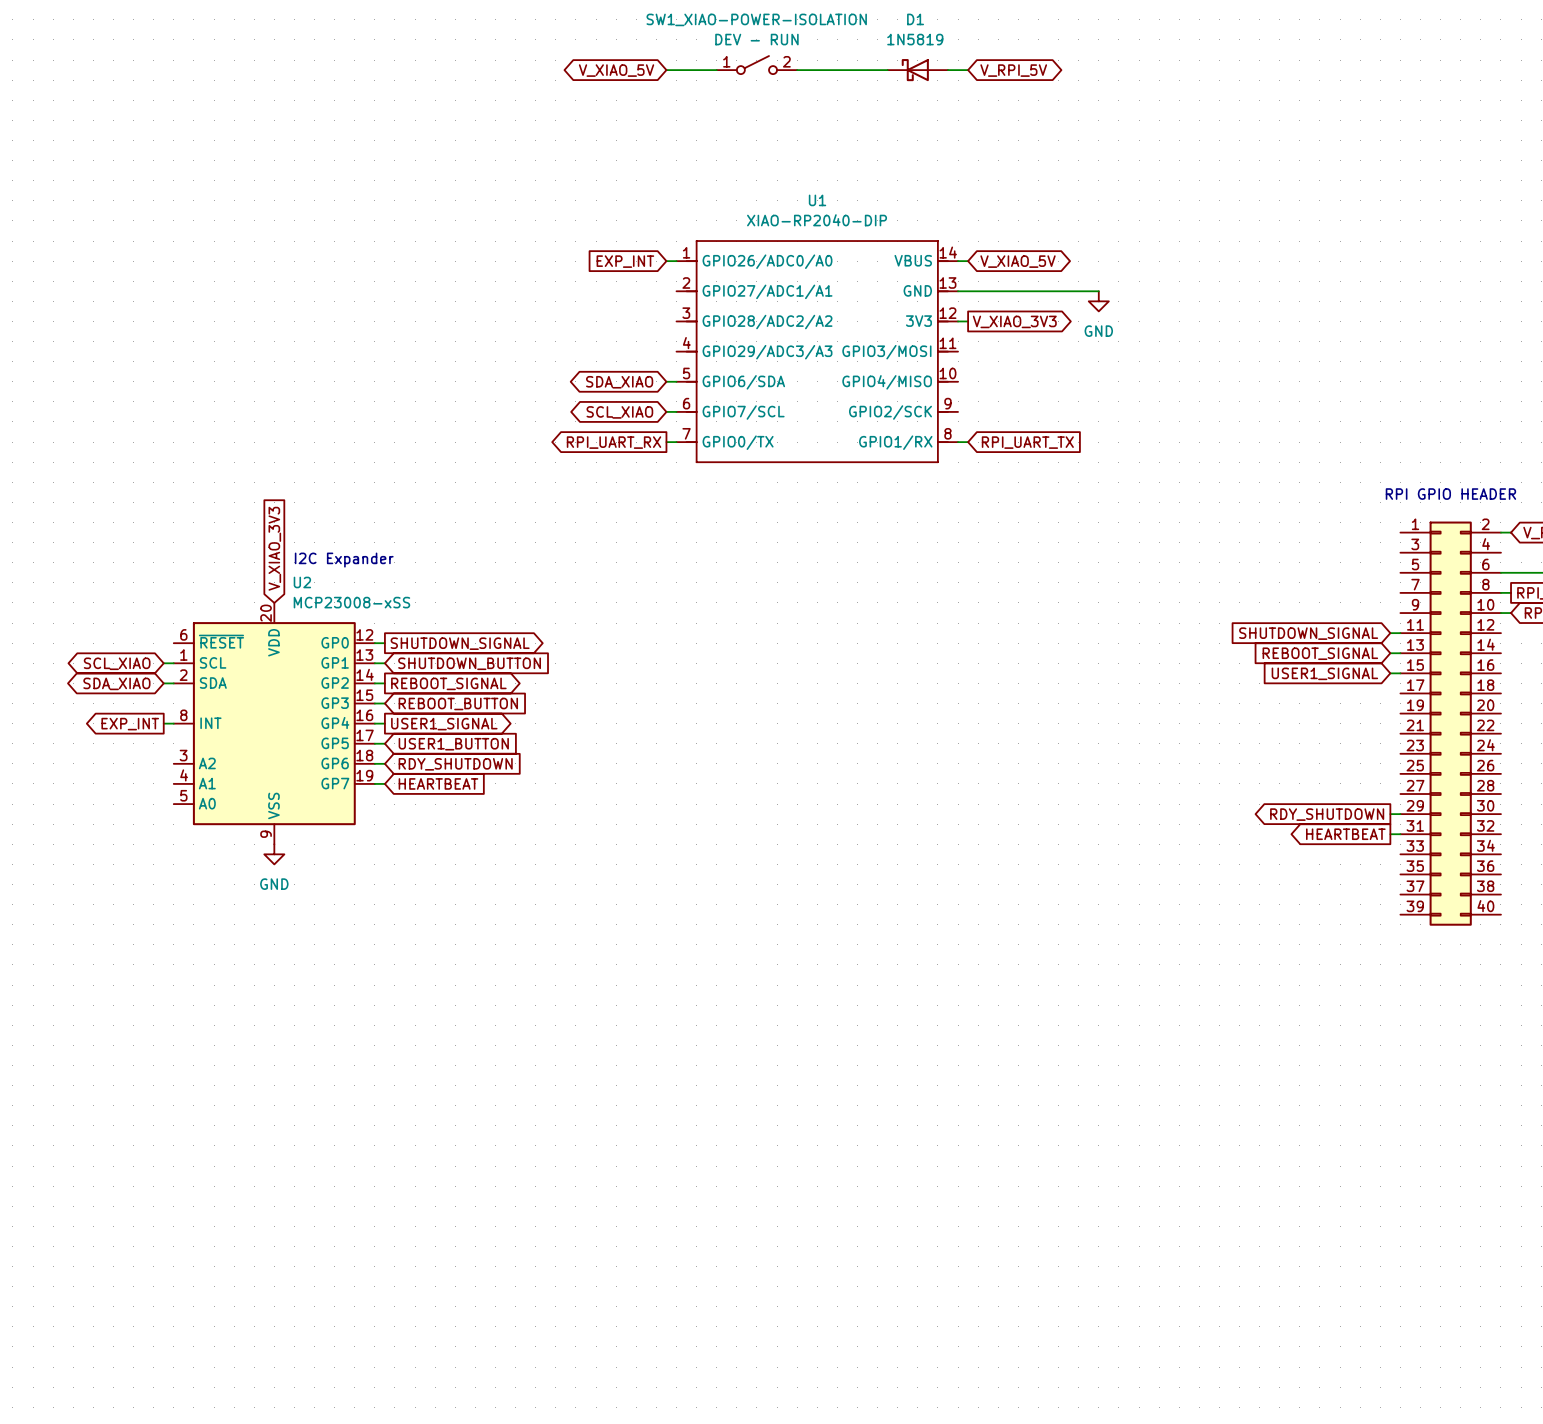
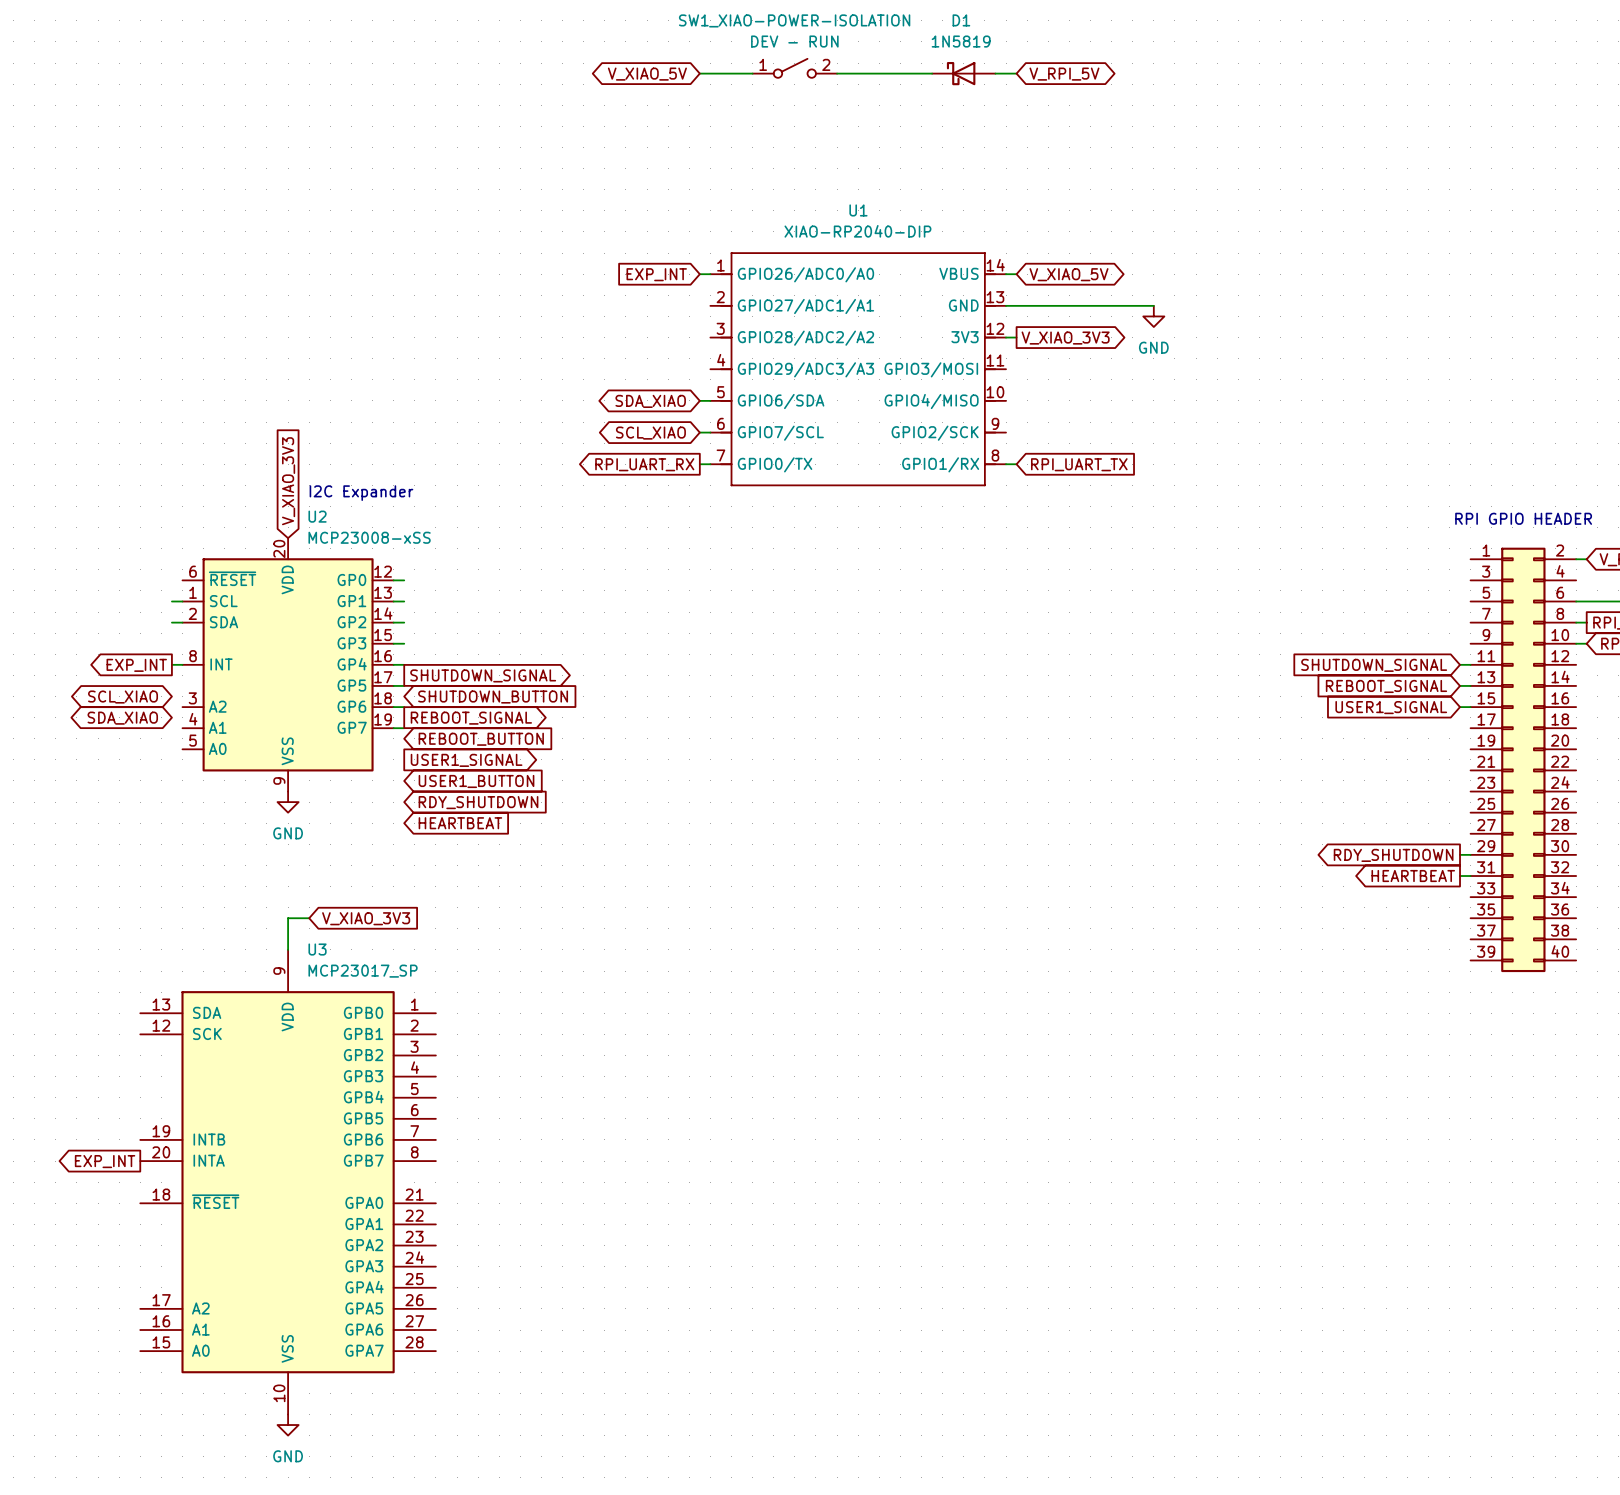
global label position: V_XIAO_3V3 (274, 548) -> V_XIAO_3V3 (288, 481)
text position: I2C Expander (344, 560) -> I2C Expander (361, 493)
wire: (374, 643) (384, 643) -> (393, 580) (404, 580)
wire: (163, 663) (173, 663) -> (171, 601) (182, 601)
wire: (374, 663) (384, 663) -> (393, 601) (404, 601)
wire: (163, 683) (173, 683) -> (171, 622) (182, 622)
wire: (374, 683) (384, 683) -> (393, 622) (404, 622)
wire: (374, 703) (384, 703) -> (393, 643) (404, 643)
wire: (163, 723) (173, 723) -> (171, 664) (182, 664)
U2 position: (274, 723) -> (288, 664)
wire: (374, 723) (384, 723) -> (393, 664) (404, 664)
global label position: EXP_INT (130, 724) -> EXP_INT (136, 665)
wire: (374, 743) (384, 743) -> (393, 685) (404, 685)
wire: (374, 763) (384, 763) -> (393, 707) (404, 707)
wire: (374, 783) (384, 783) -> (393, 728) (404, 728)
power symbol position: GND (274, 854) -> GND (288, 802)
wire: none -> (309, 918) (288, 918) (288, 949)
global label: none -> V_XIAO_3V3 (366, 918)
global label: none -> EXP_INT (105, 1161)
U3: none -> MCP23017_SP (288, 1182)
power symbol: none -> GND (288, 1425)

